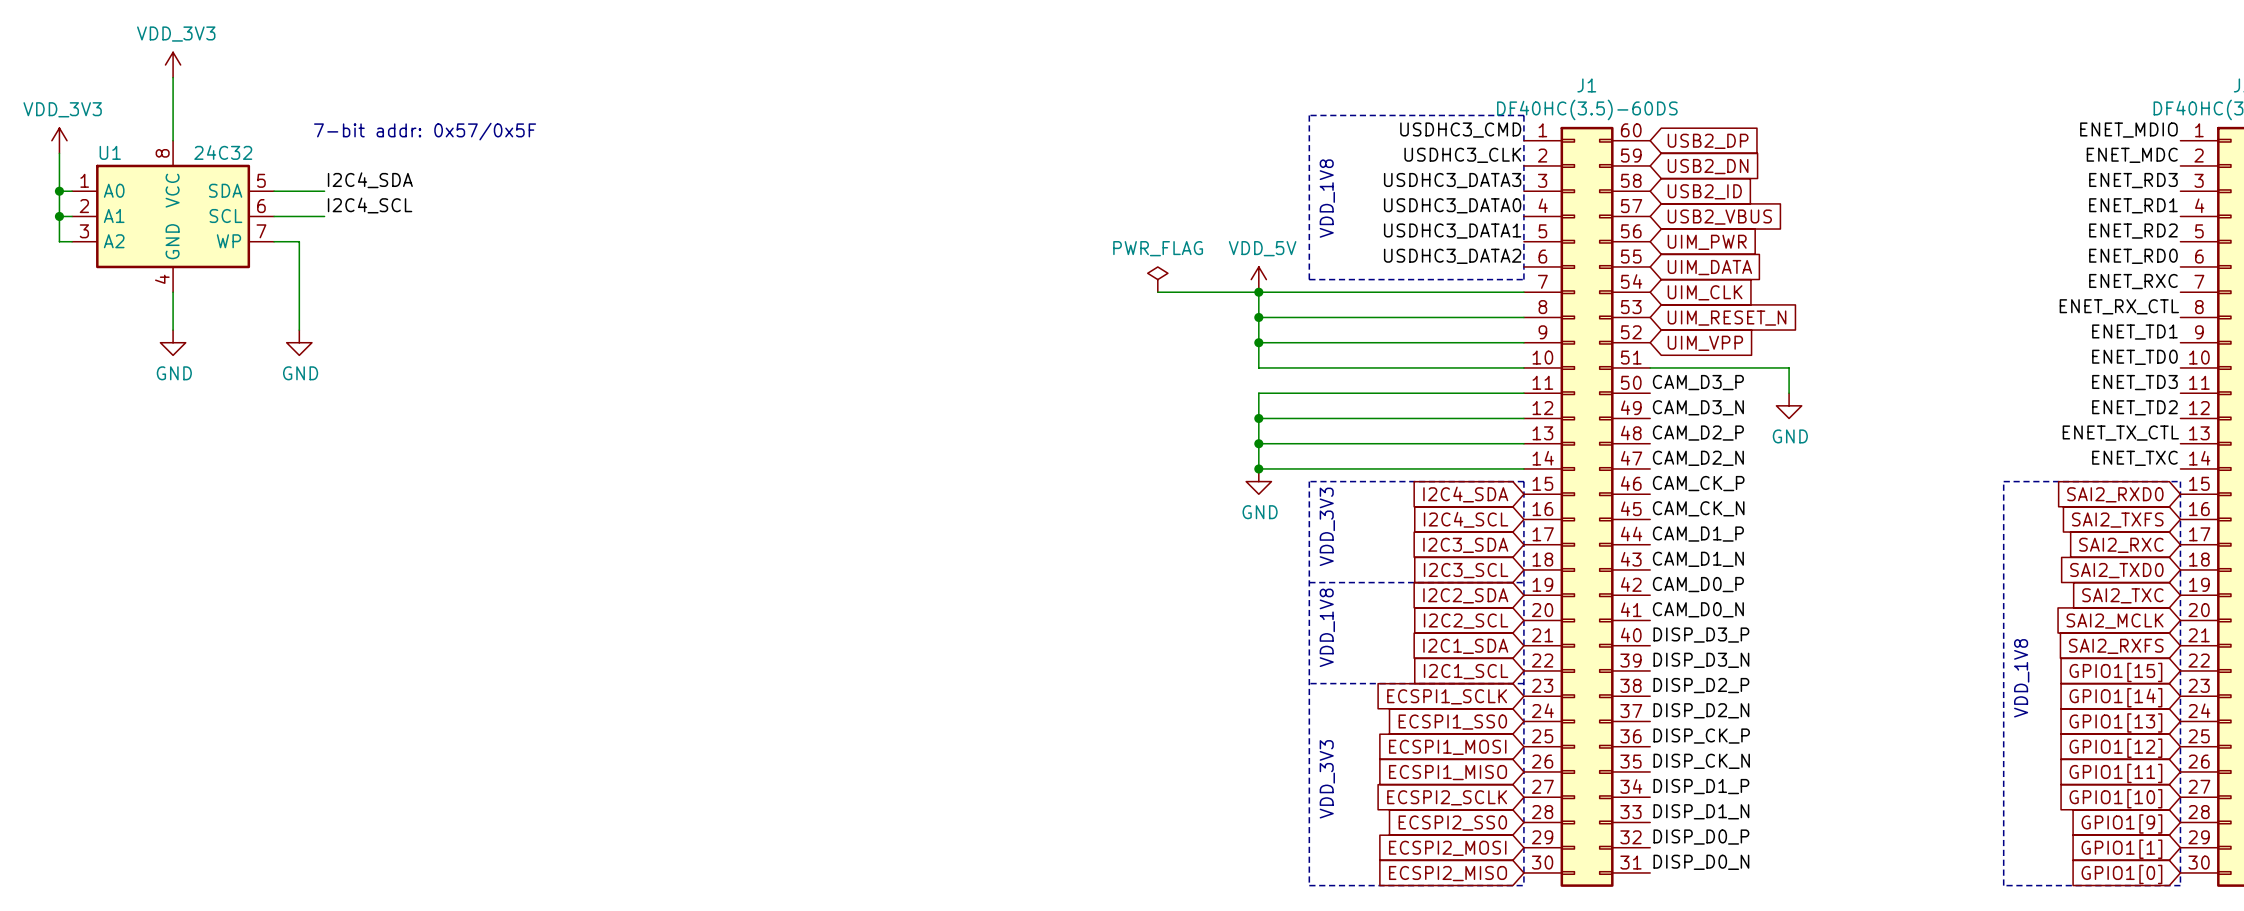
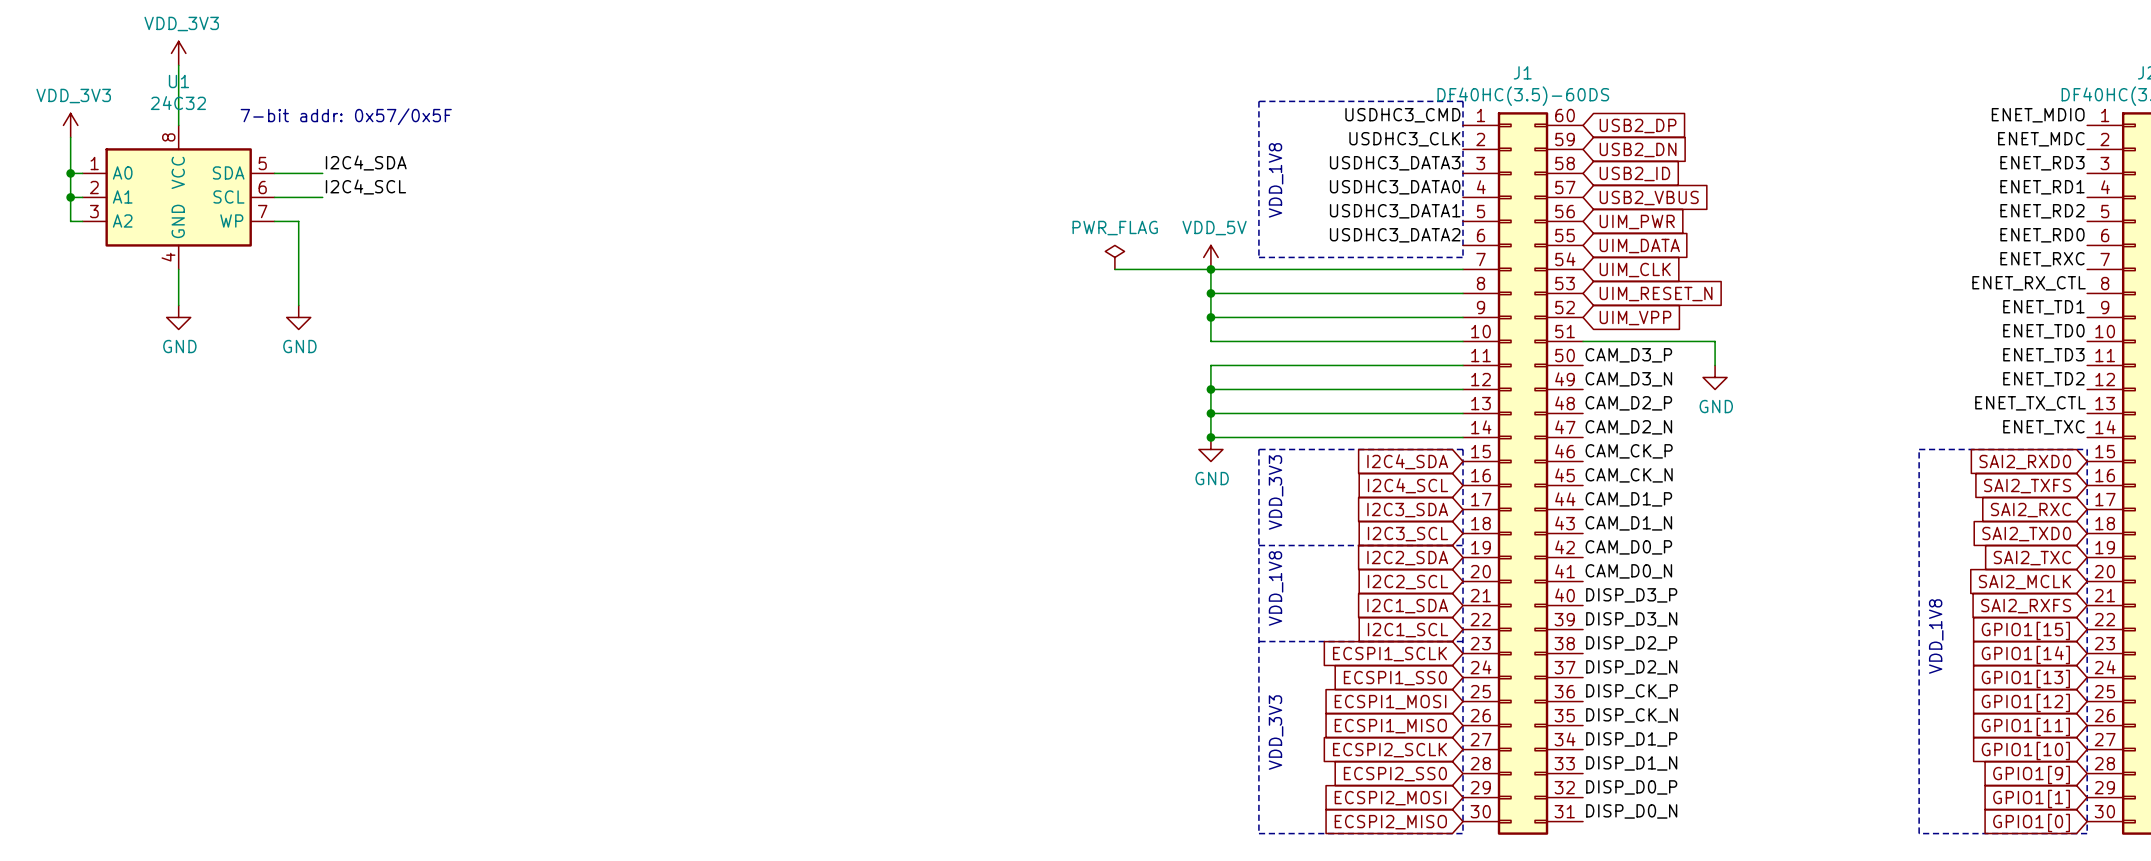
text position: 7-bit addr: 0x57/0x5F (425, 131) -> 7-bit addr: 0x57/0x5F (346, 116)
U1 name position: U1 (110, 152) -> U1 (178, 81)
U1 value position: 24C32 (223, 152) -> 24C32 (178, 103)

